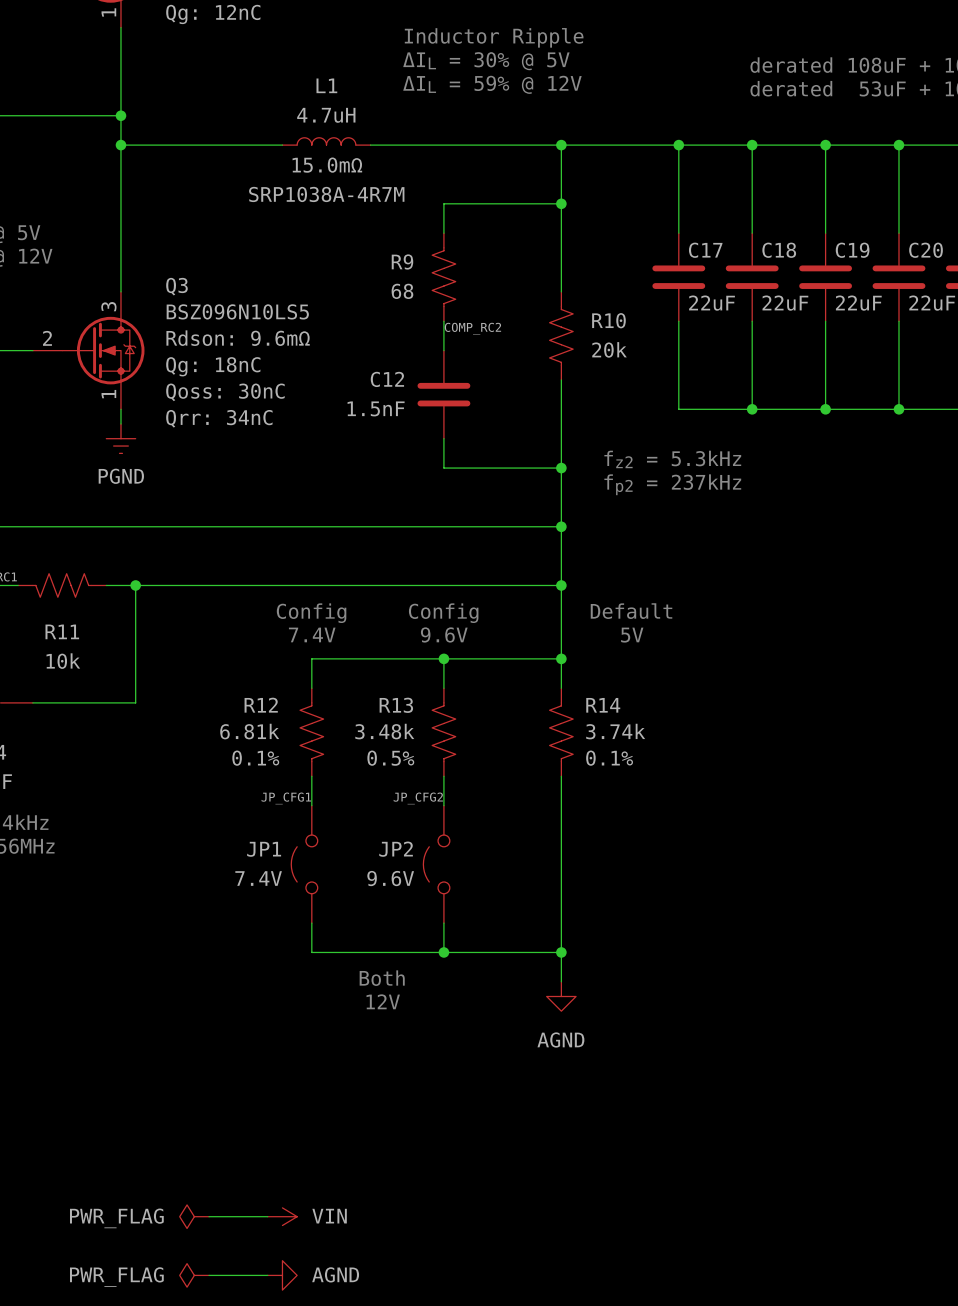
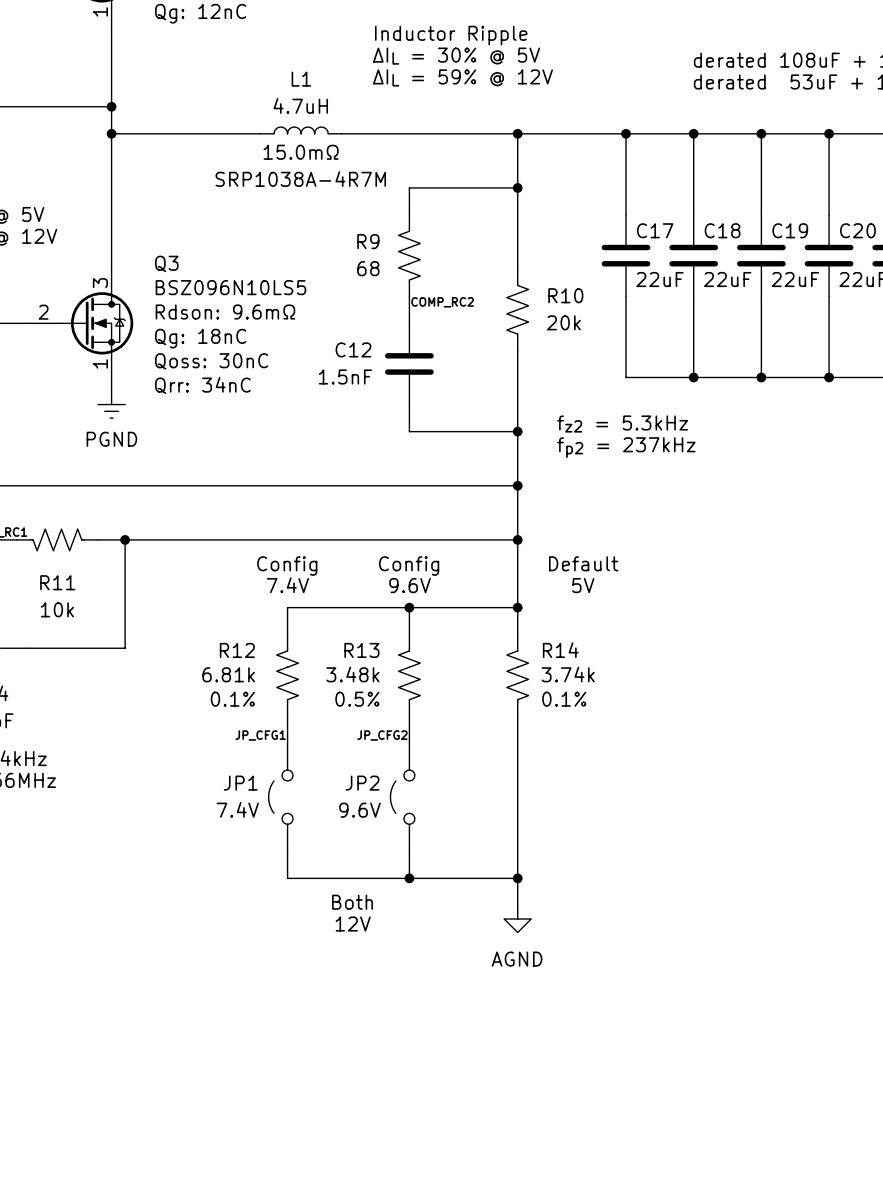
power symbol: PWR_FLAG (194, 1216) -> none
wire: (209, 1216) (267, 1216) -> none
power symbol: VIN (282, 1216) -> none
power symbol: PWR_FLAG (194, 1275) -> none
wire: (209, 1275) (267, 1275) -> none
power symbol: AGND (282, 1275) -> none

